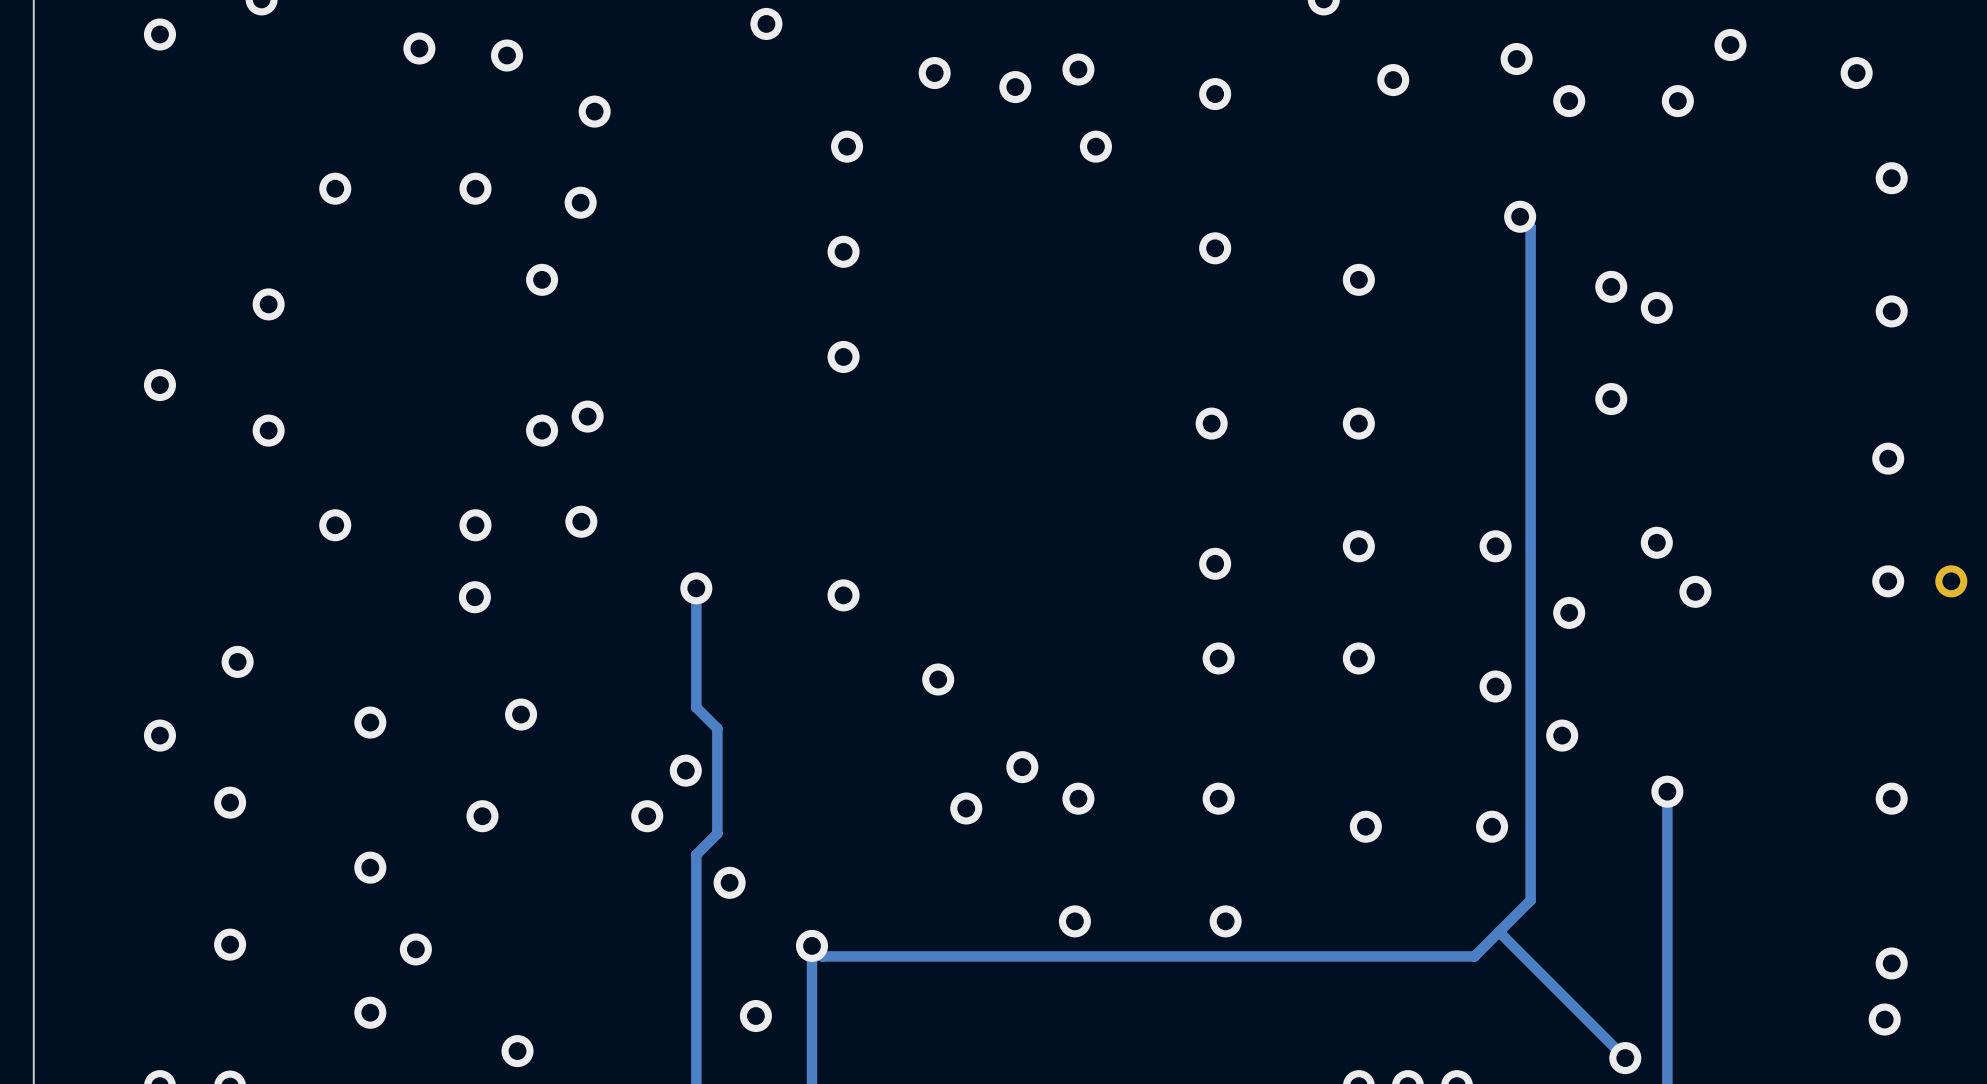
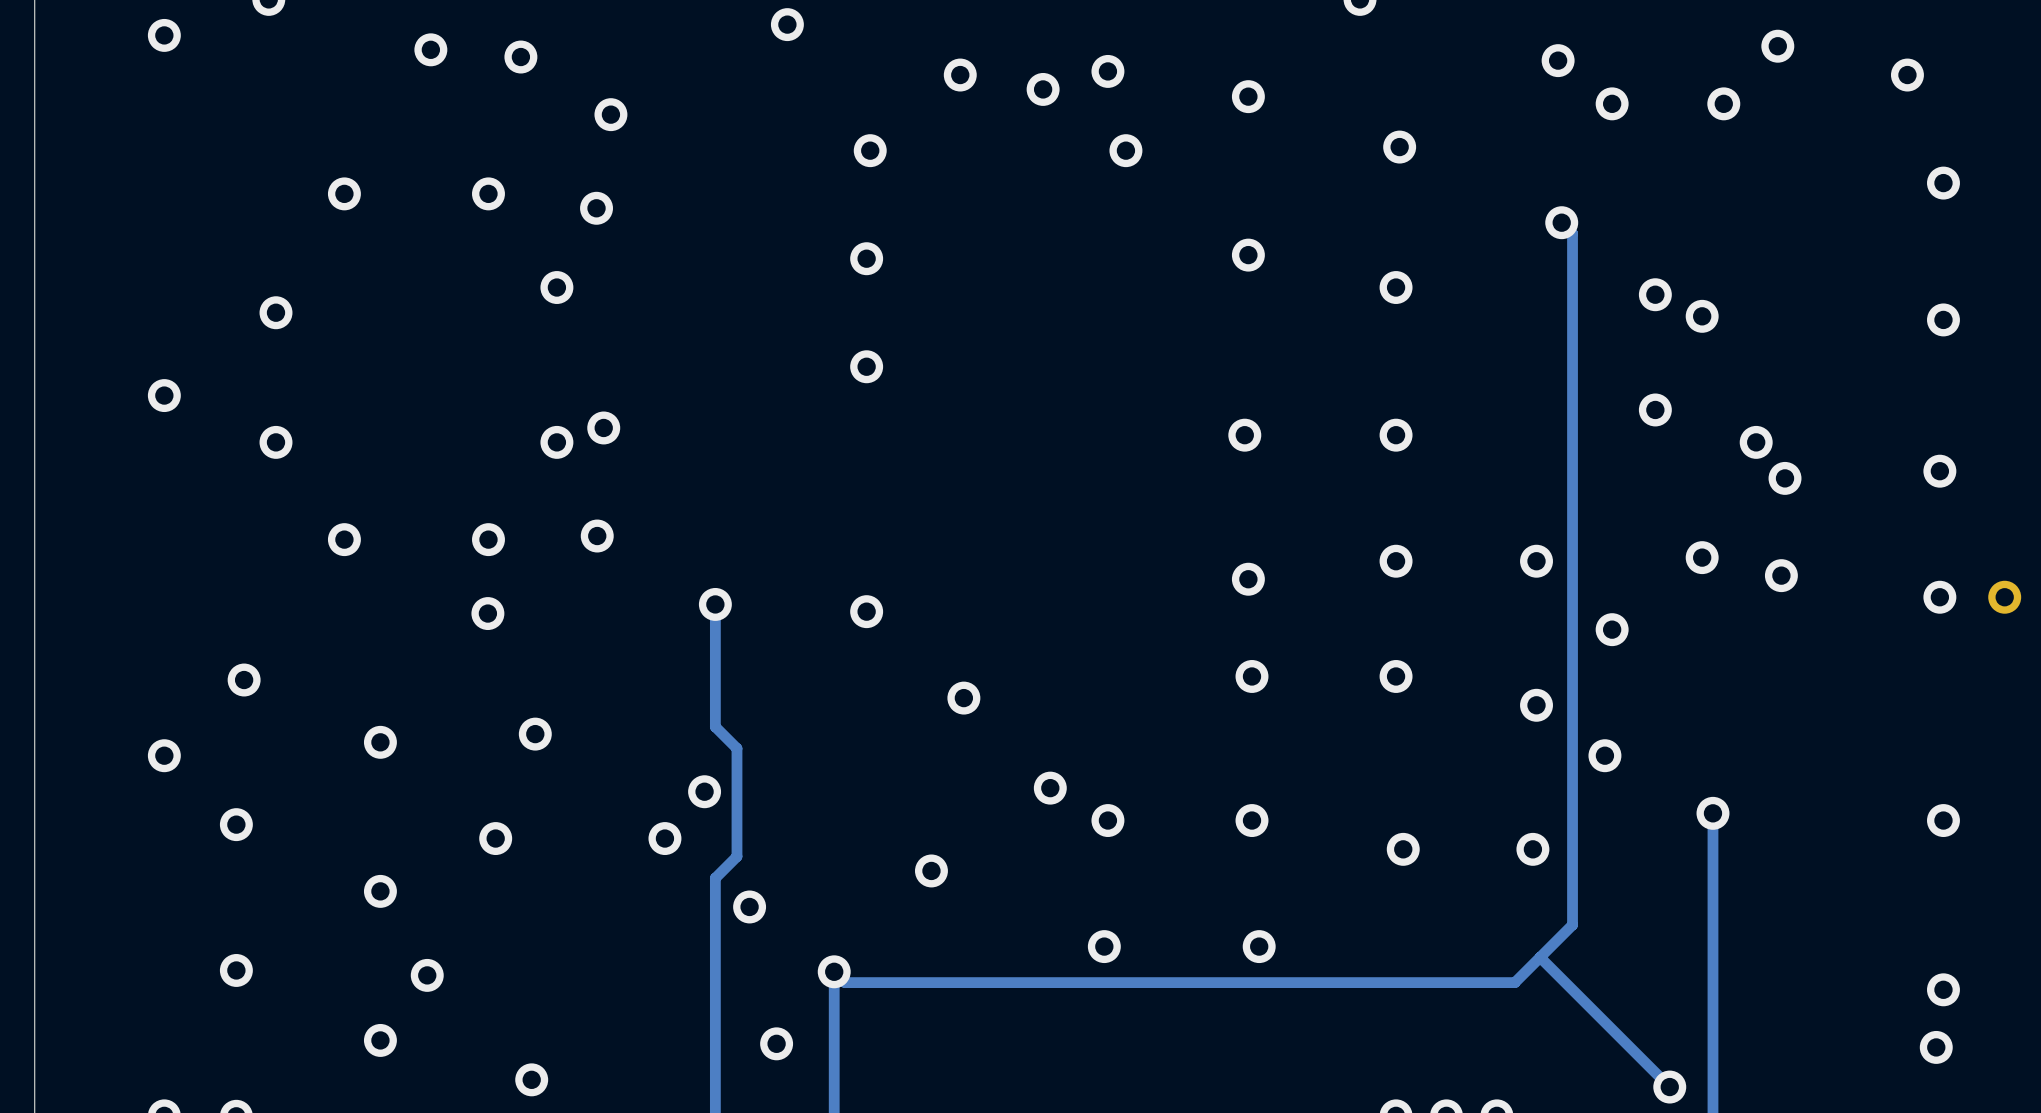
via position: (1393, 80) -> (1399, 147)
via: none -> (1756, 442)
via: none -> (1785, 478)
via position: (1695, 591) -> (1781, 575)
via position: (966, 808) -> (931, 870)

